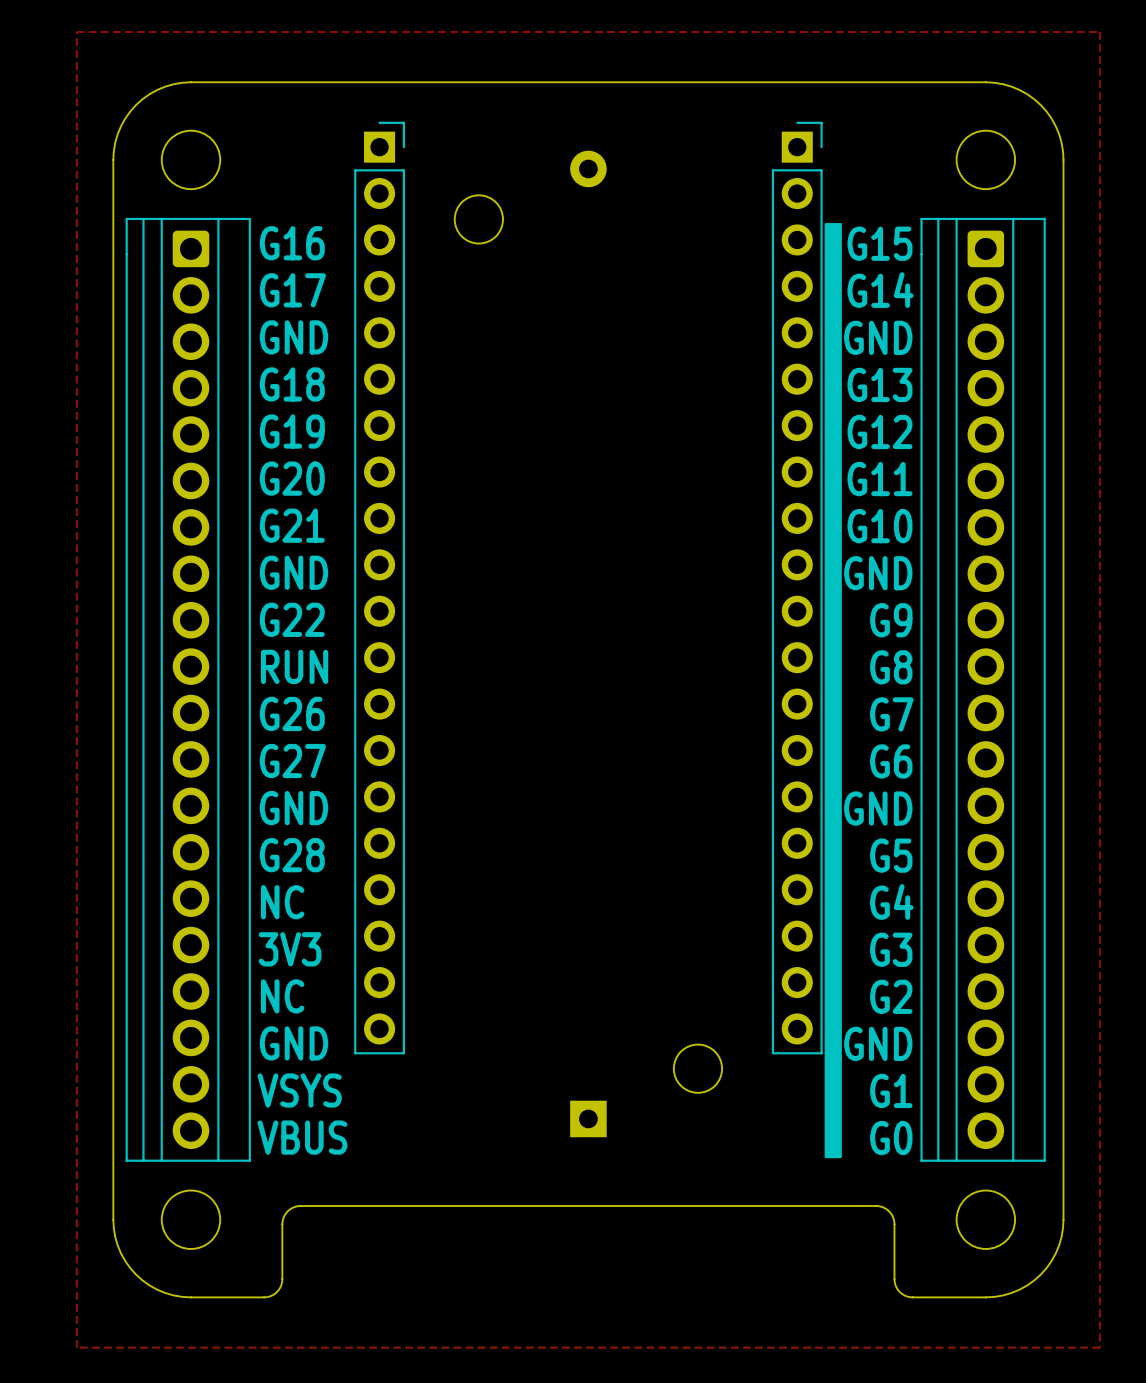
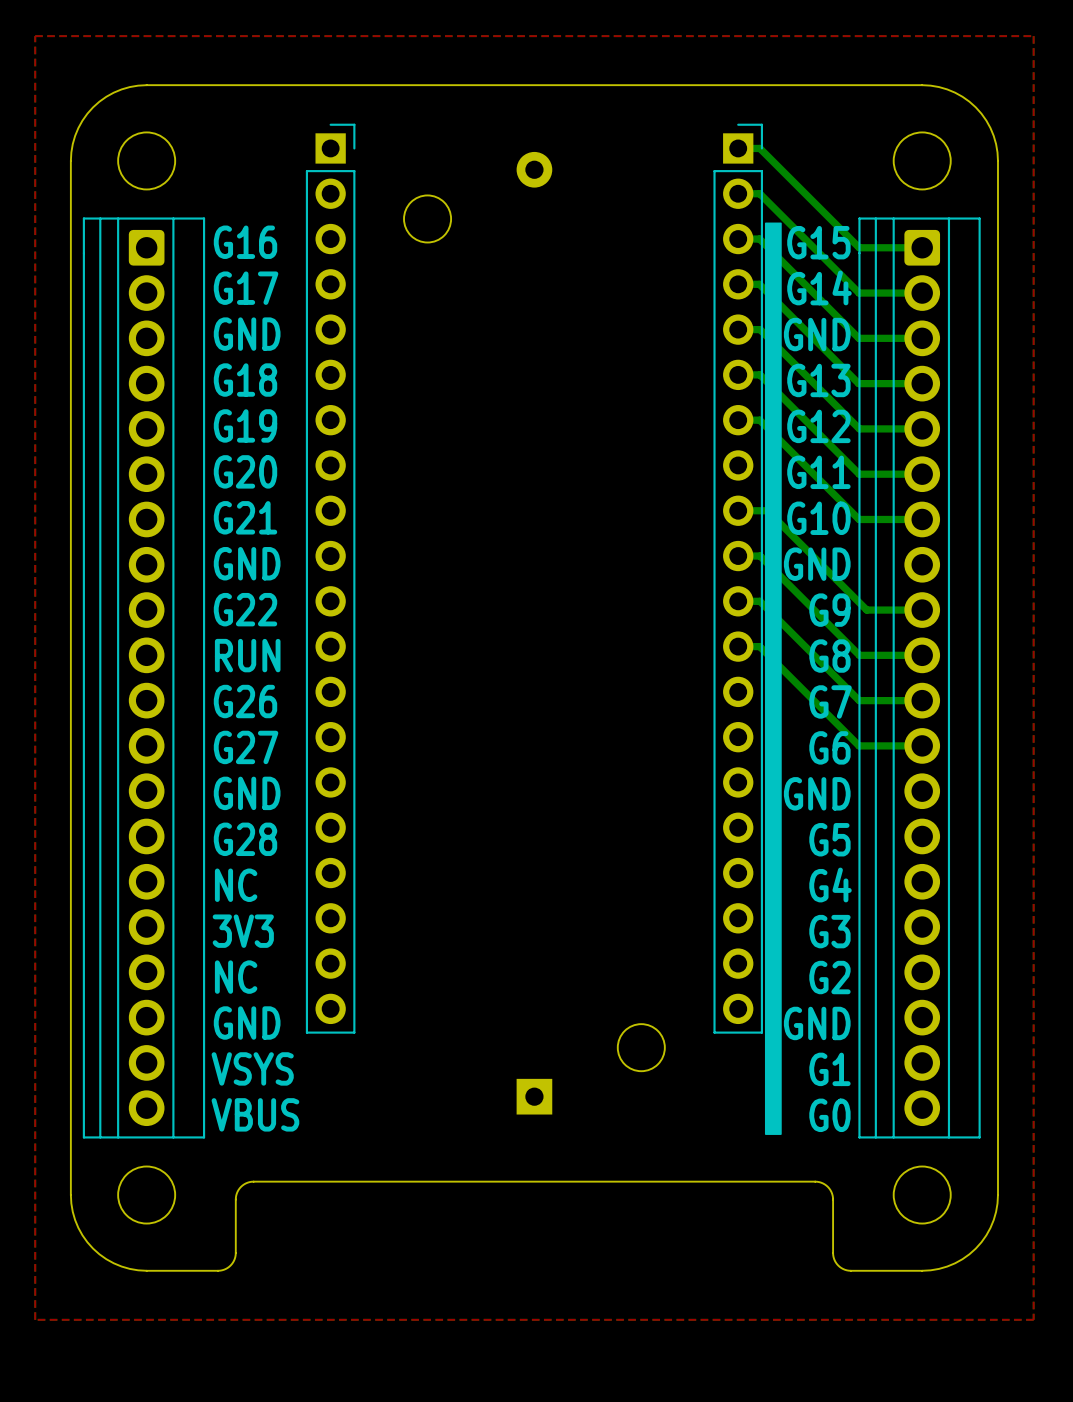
bottom track: none -> (738, 148) (759, 148) (859, 247) (922, 247)
bottom track: none -> (738, 193) (759, 193) (859, 293) (922, 293)
bottom track: none -> (738, 239) (759, 239) (858, 338) (922, 338)
bottom track: none -> (738, 284) (759, 284) (858, 383) (922, 383)
bottom track: none -> (738, 329) (760, 329) (859, 428) (922, 428)
bottom track: none -> (738, 374) (759, 374) (859, 474) (922, 474)
bottom track: none -> (738, 420) (759, 420) (859, 519) (922, 519)
bottom track: none -> (738, 510) (767, 510) (866, 610) (922, 610)
bottom track: none -> (738, 556) (760, 556) (859, 655) (922, 655)
bottom track: none -> (738, 601) (759, 601) (859, 700) (922, 700)
bottom track: none -> (738, 646) (759, 646) (859, 745) (922, 745)

